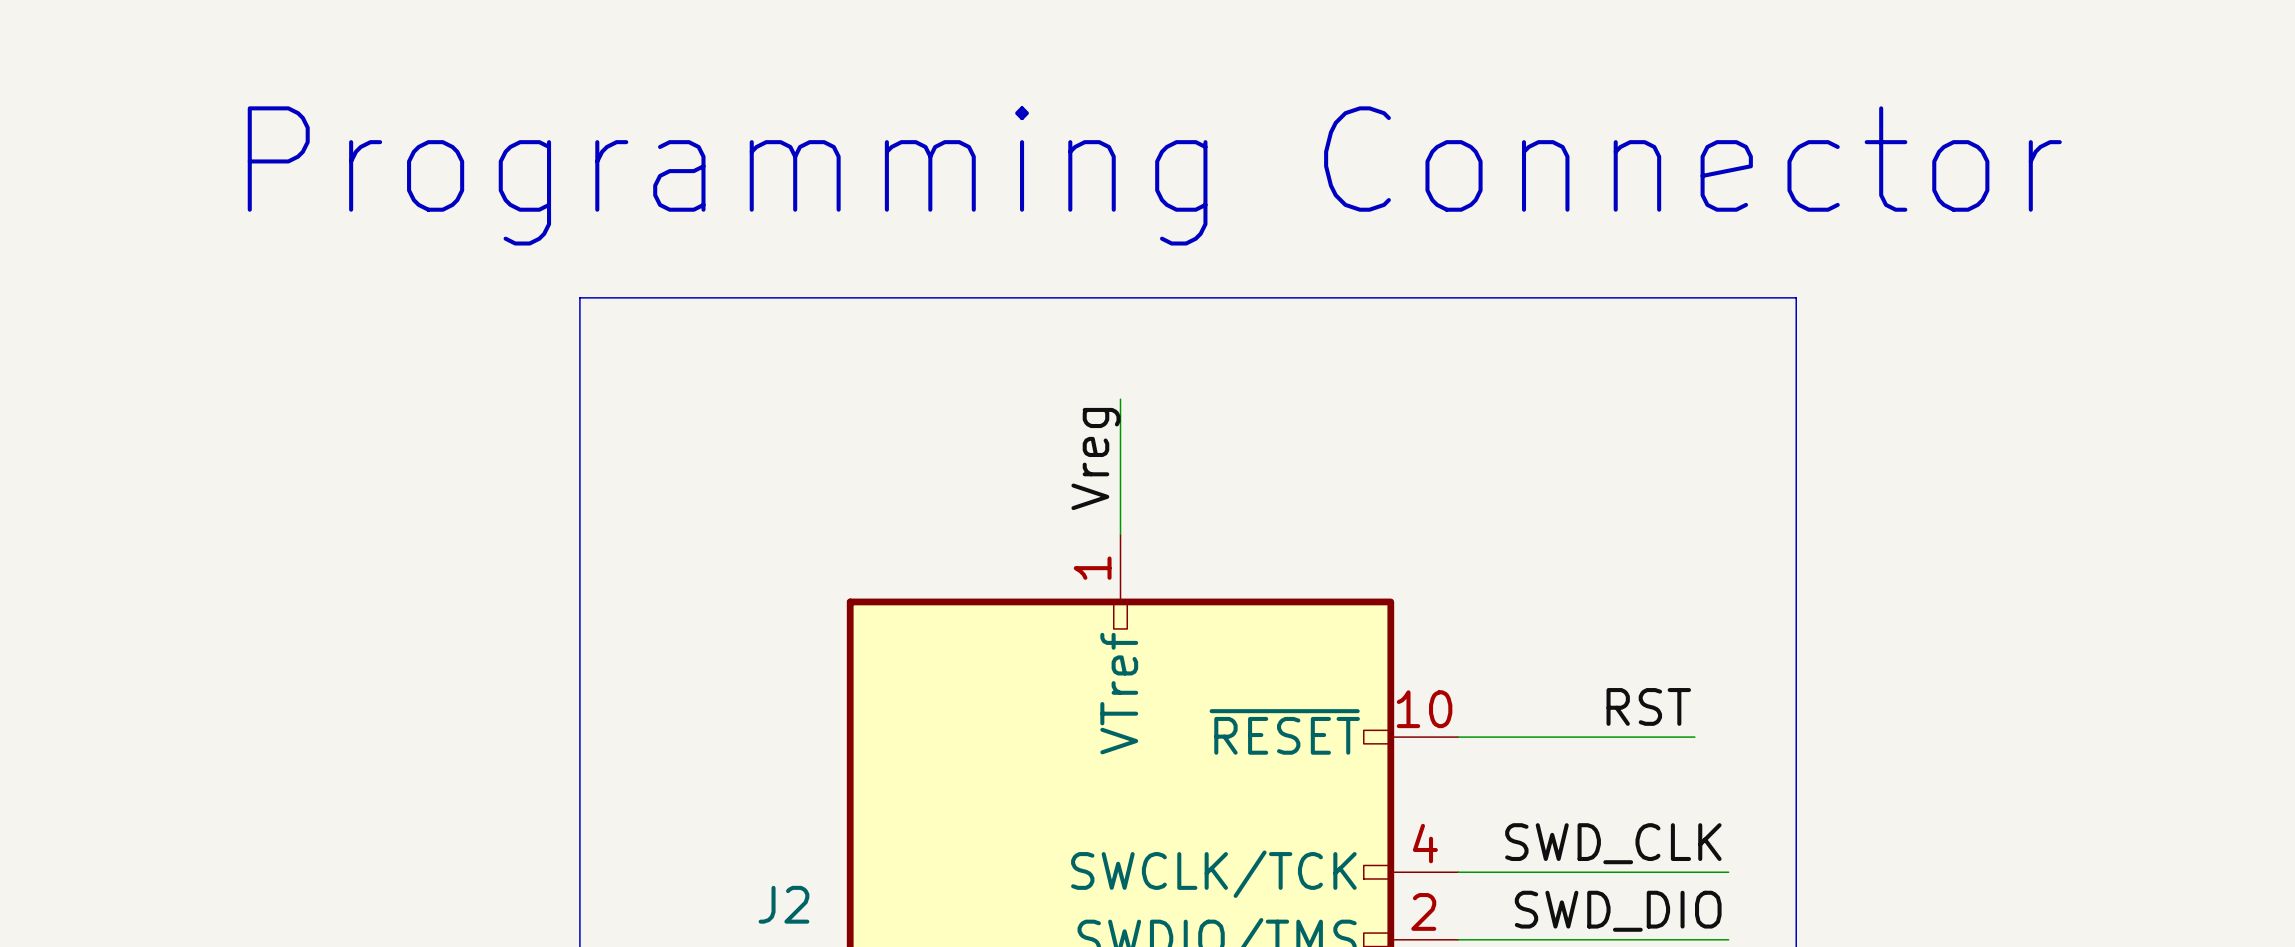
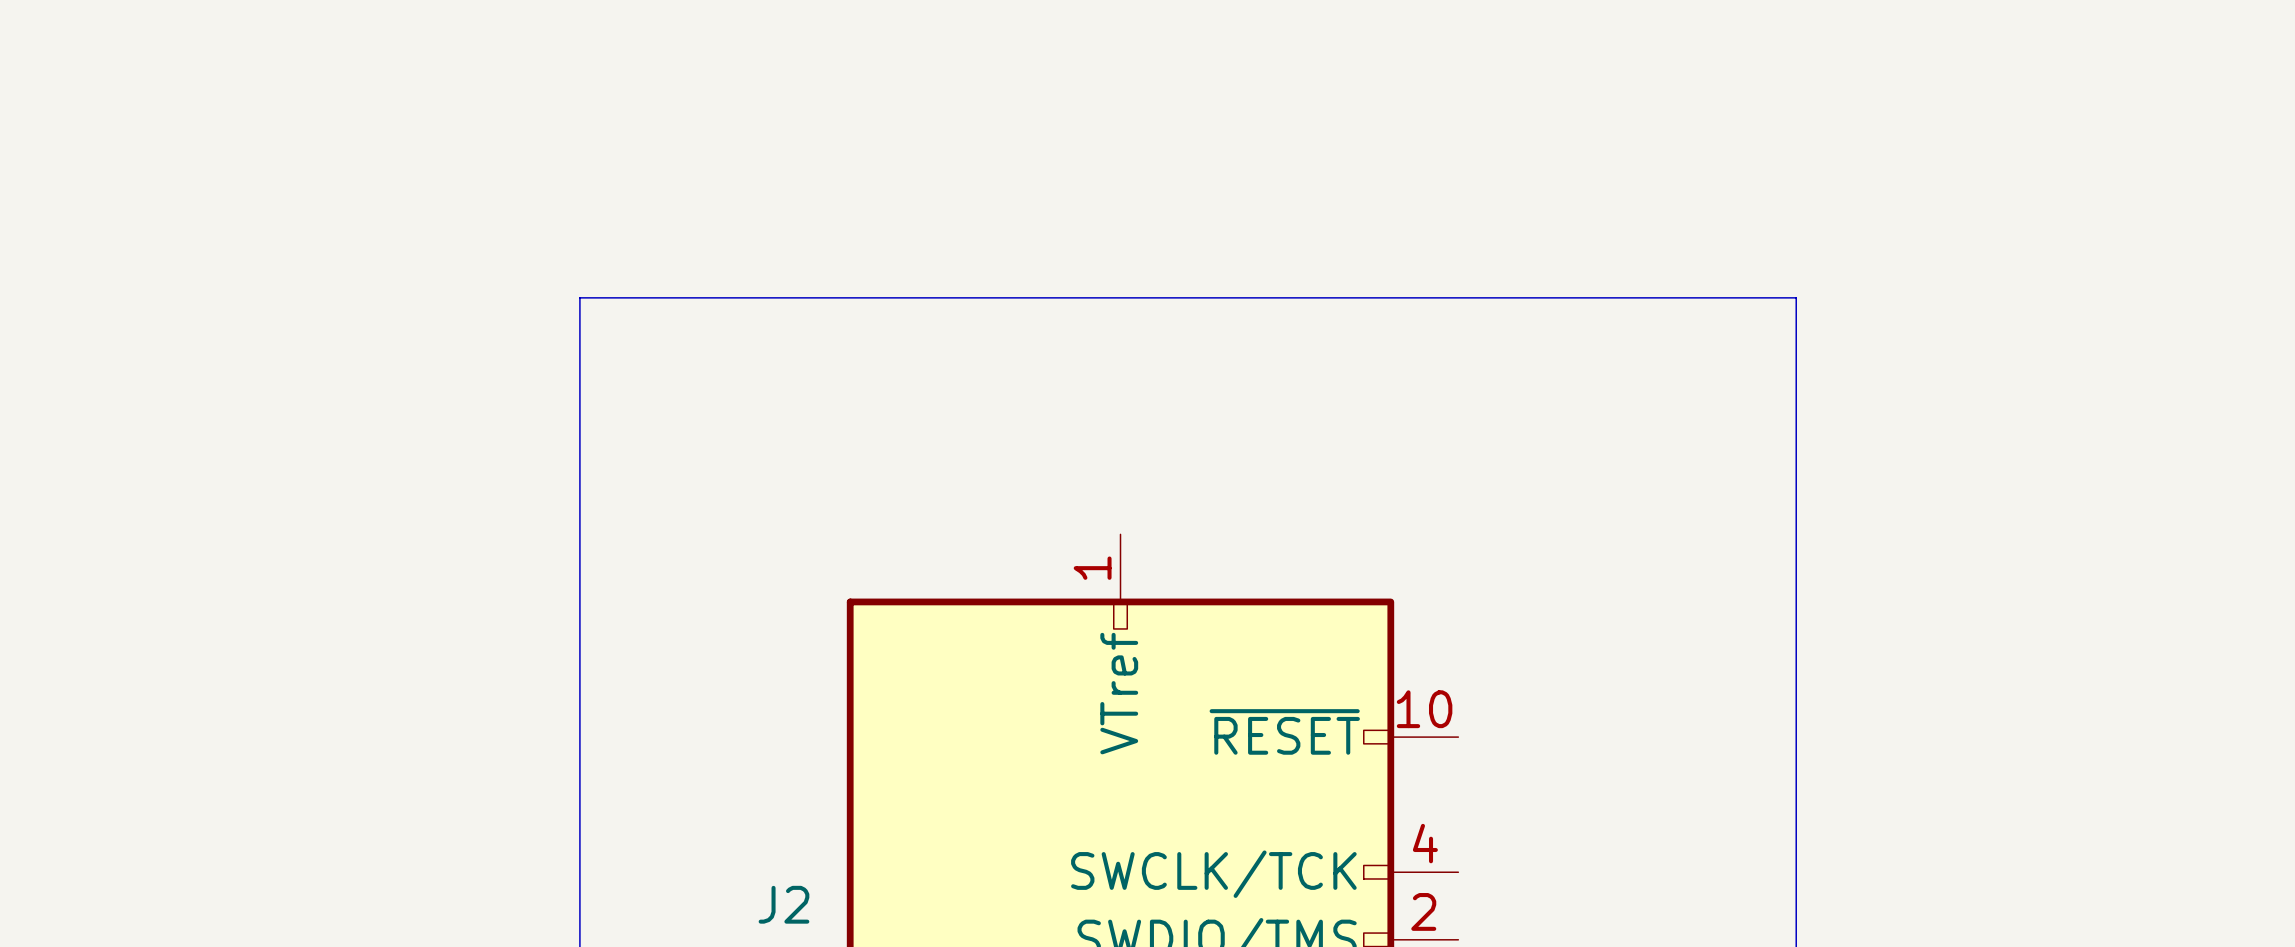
text: Programming Connector (1154, 175) -> none
wire: (1120, 399) (1120, 534) -> none
label: Vreg (1095, 459) -> none
label: RST (1648, 706) -> none
wire: (1458, 737) (1694, 737) -> none
label: SWD_CLK (1613, 843) -> none
wire: (1458, 872) (1728, 872) -> none
label: SWD_DIO (1618, 911) -> none
wire: (1458, 939) (1728, 939) -> none

